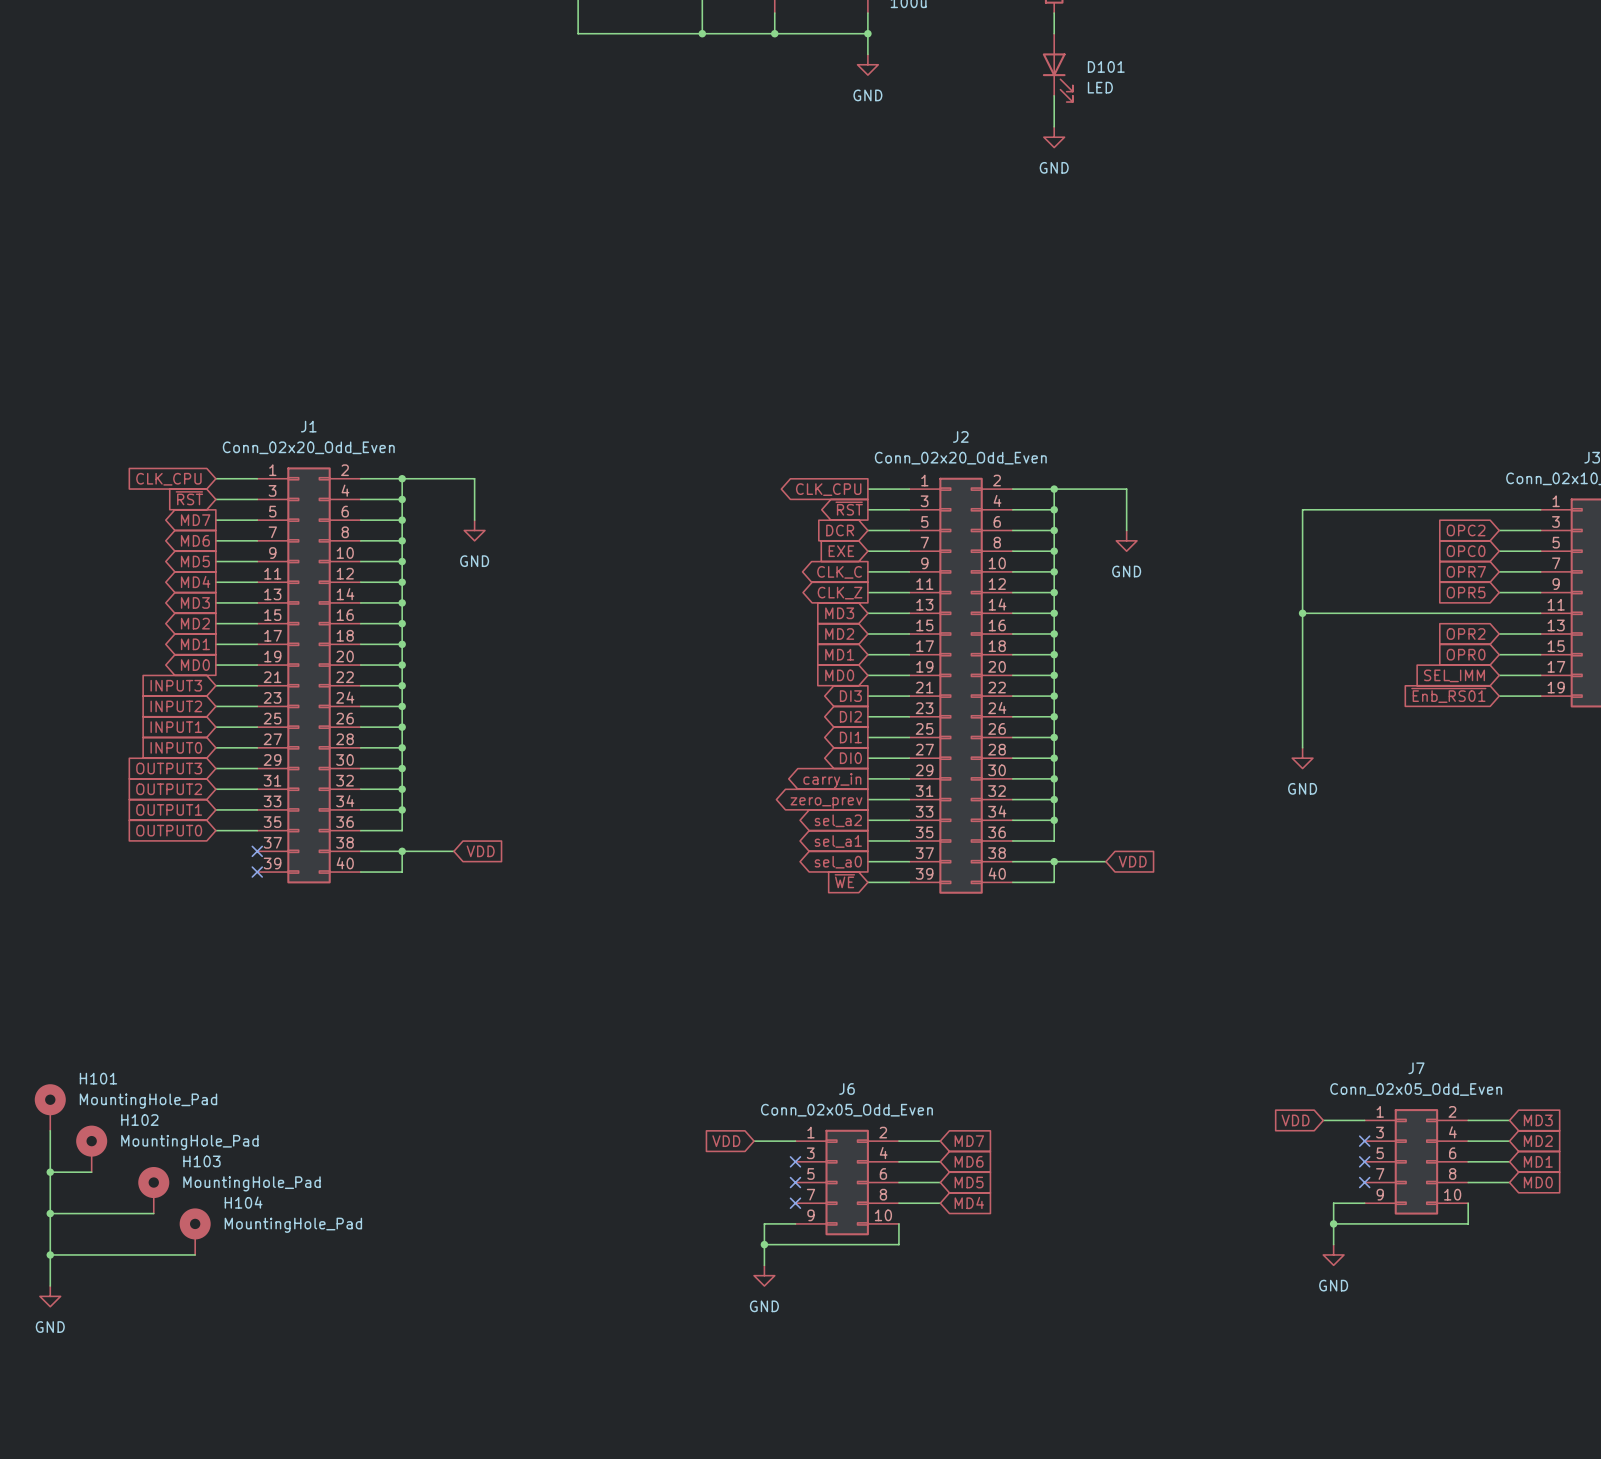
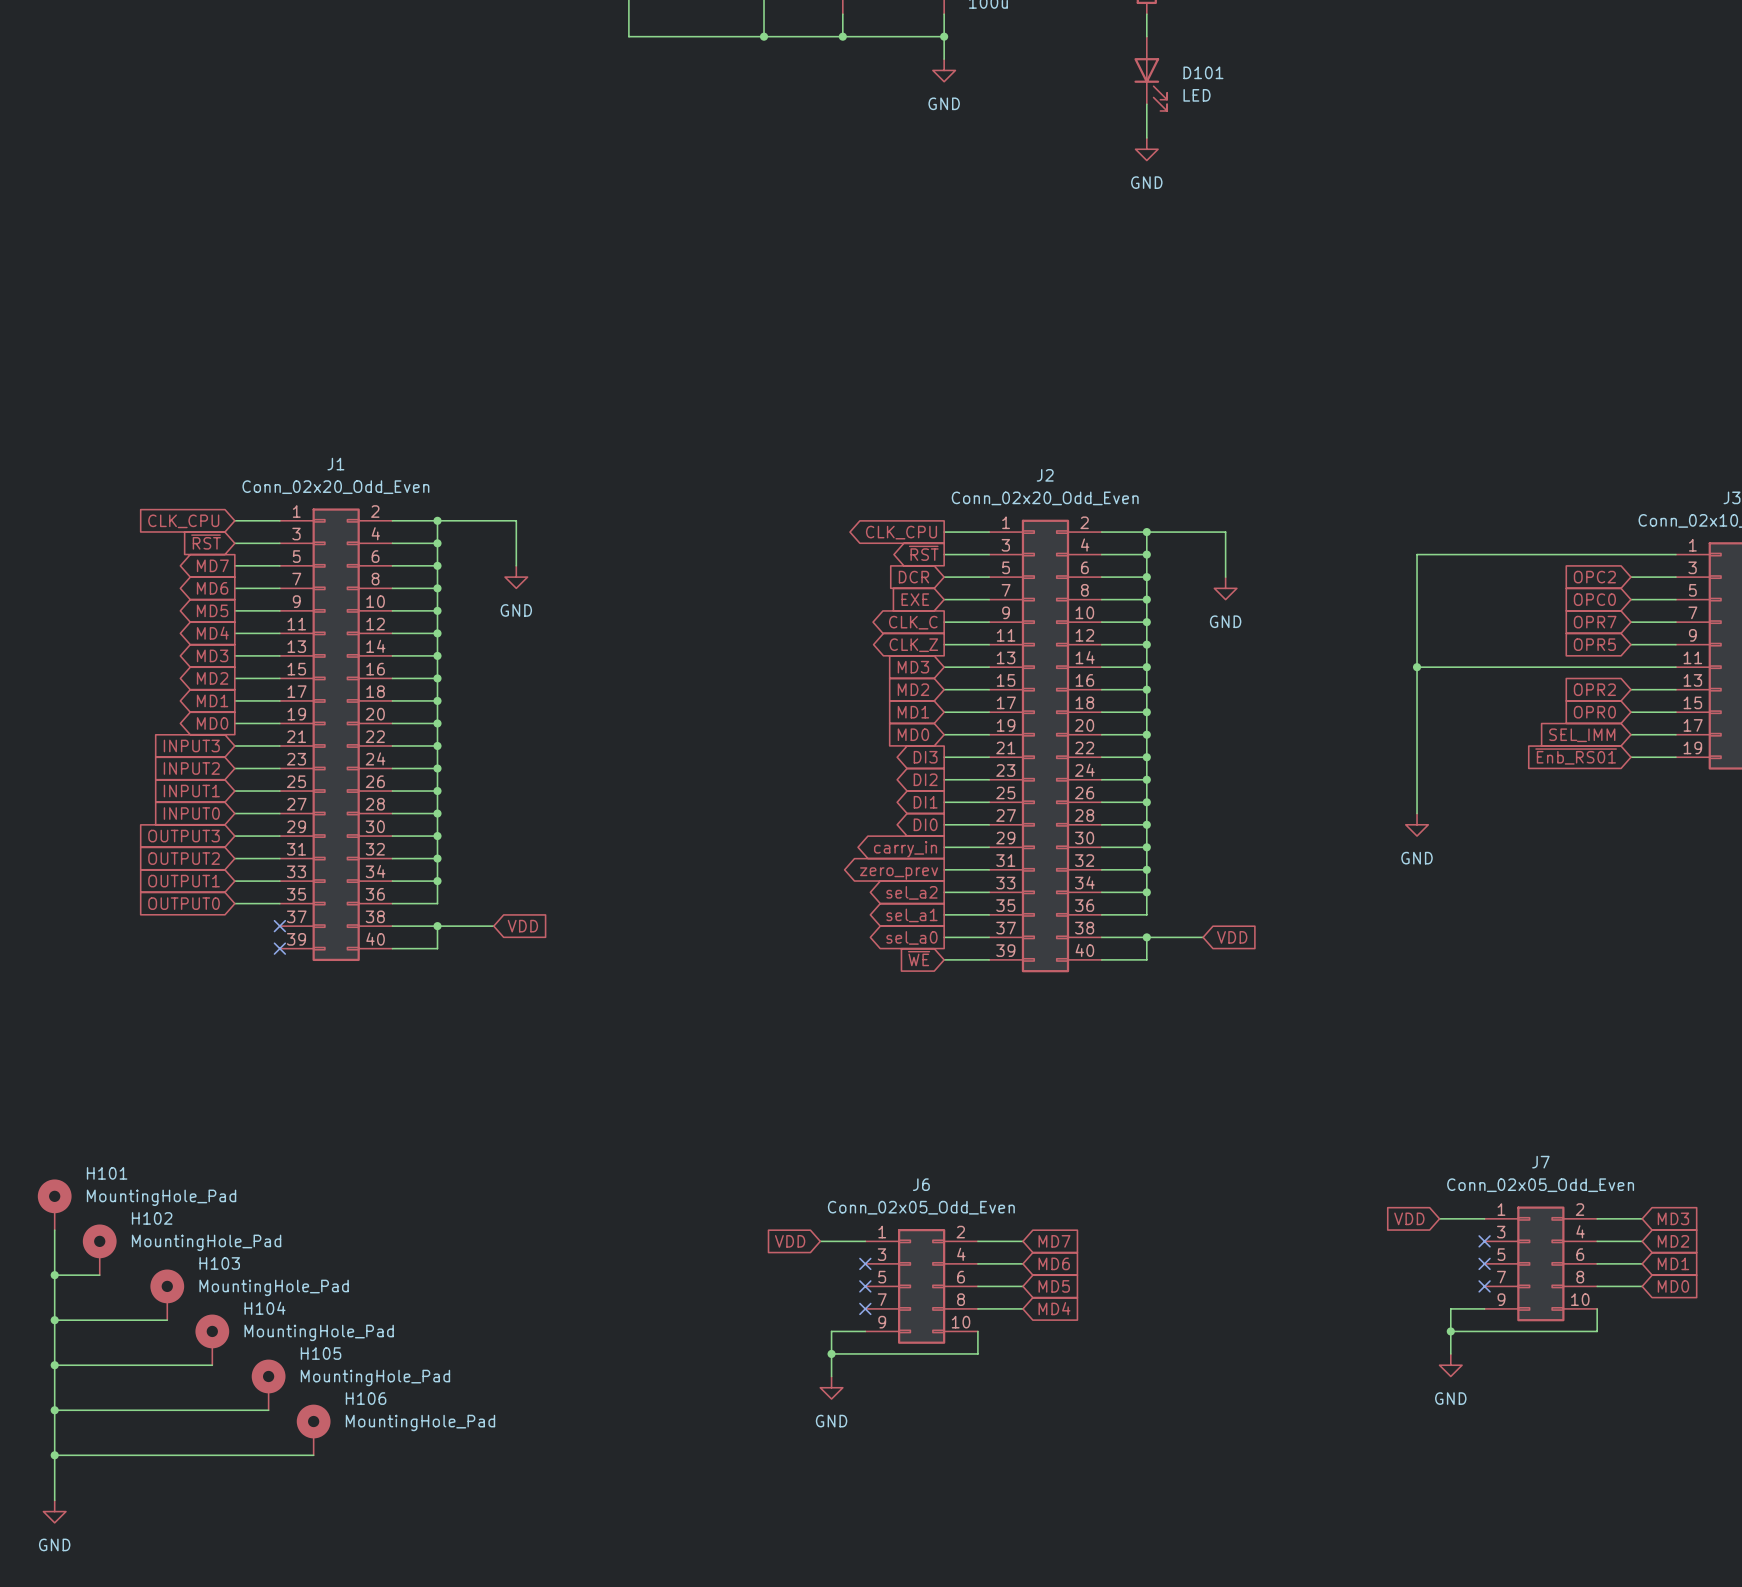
H105: none -> MountingHole_Pad (268, 1384)
wire: none -> (54, 1399) (54, 1500)
wire: none -> (54, 1410) (268, 1410)
power symbol position: GND (50, 1296) -> GND (54, 1511)
junction: none -> (54, 1410)
H106: none -> MountingHole_Pad (313, 1429)
wire: none -> (54, 1455) (313, 1455)
junction: none -> (54, 1455)

